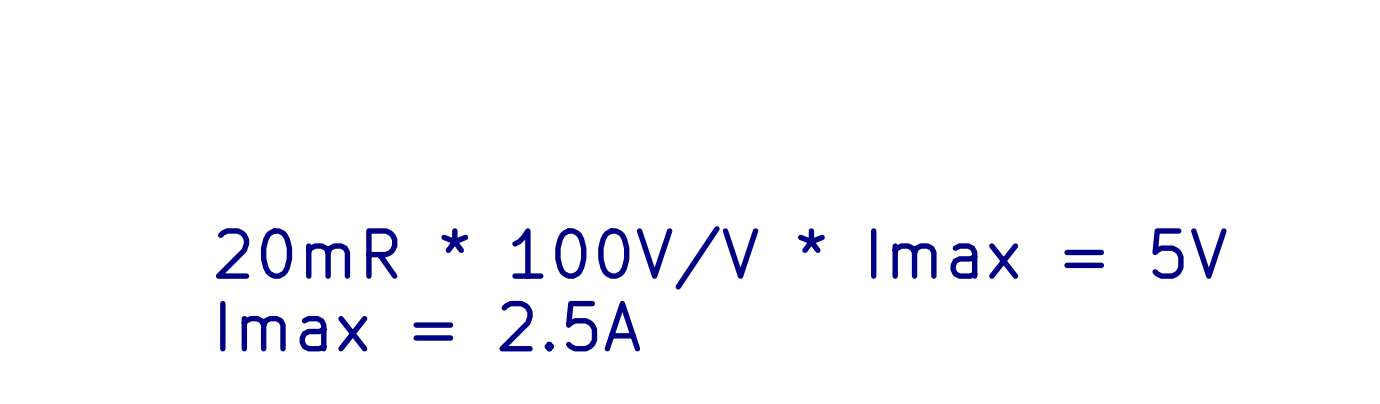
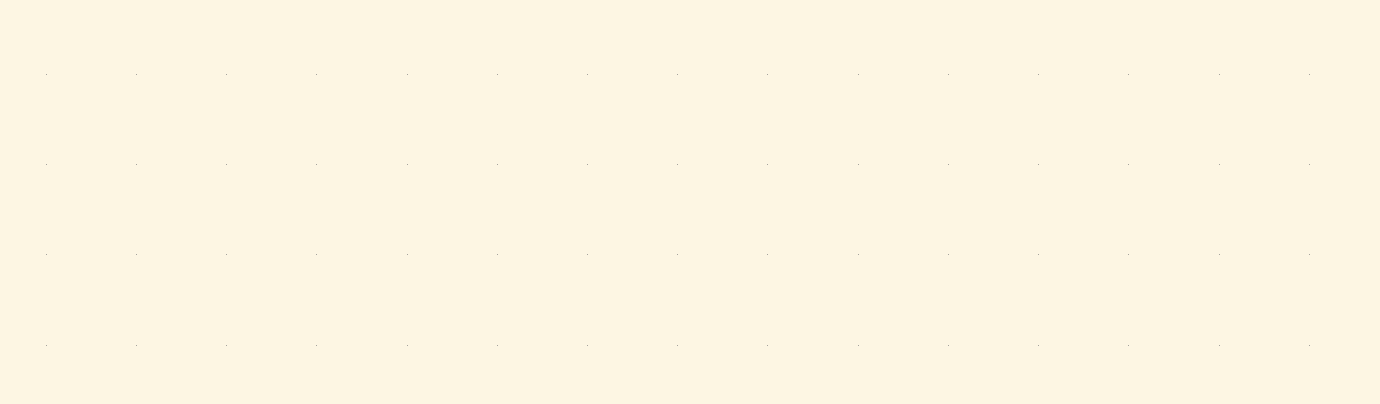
text: 20mR * 100V/V * Imax = 5V (721, 257) -> none
text: Imax = 2.5A (430, 326) -> none

